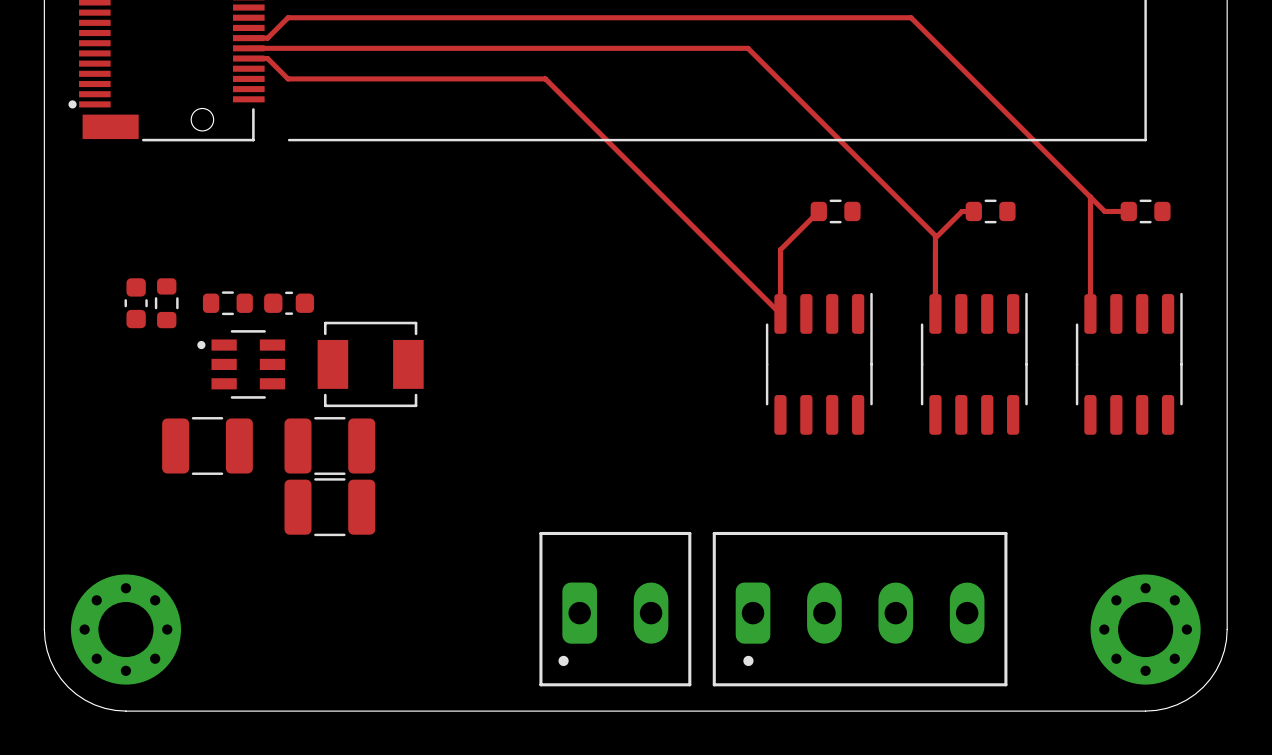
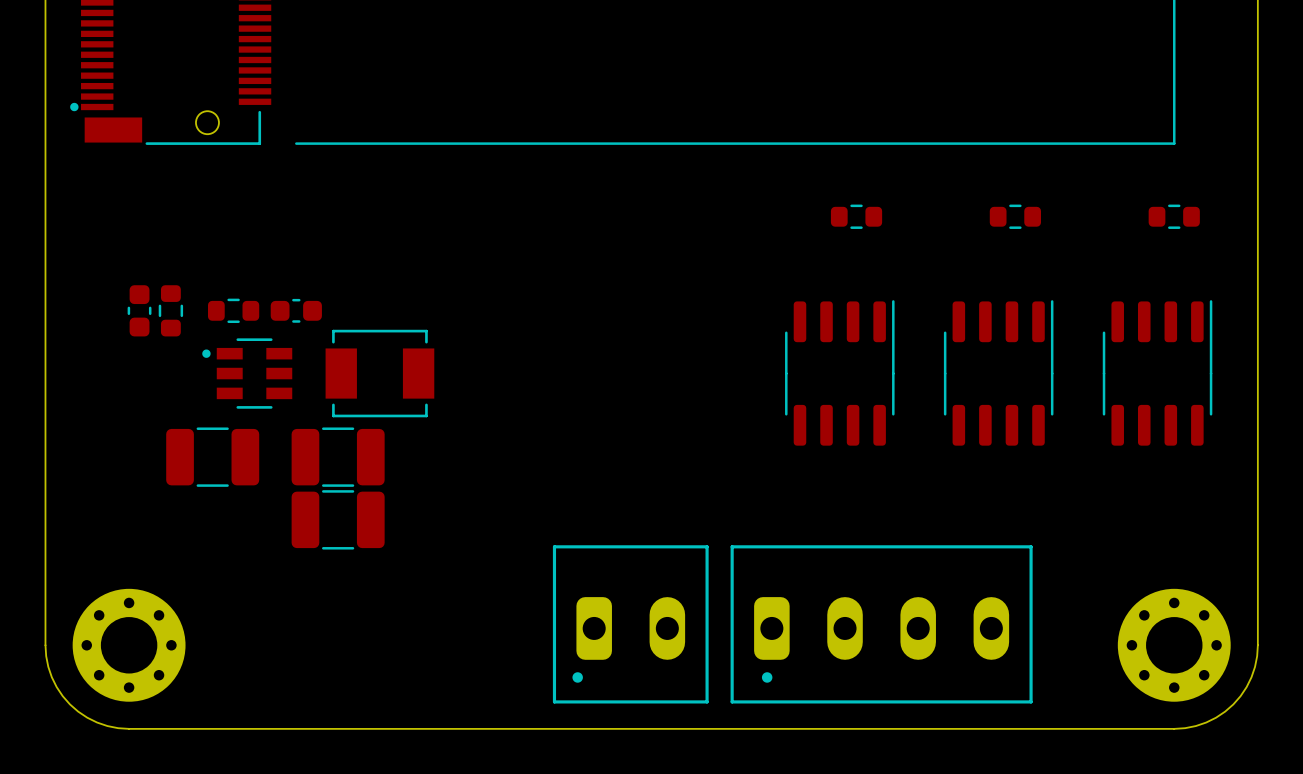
top track: (248, 38) (267, 38) (288, 17) (911, 17) (1104, 211) (1128, 211) -> none
top track: (248, 48) (747, 48) (935, 235) (935, 313) -> none
top track: (248, 58) (267, 58) (288, 78) (545, 78) (780, 313) (780, 249) (818, 211) -> none
top track: (1090, 197) (1090, 313) -> none
top track: (973, 211) (962, 211) (935, 238) -> none

